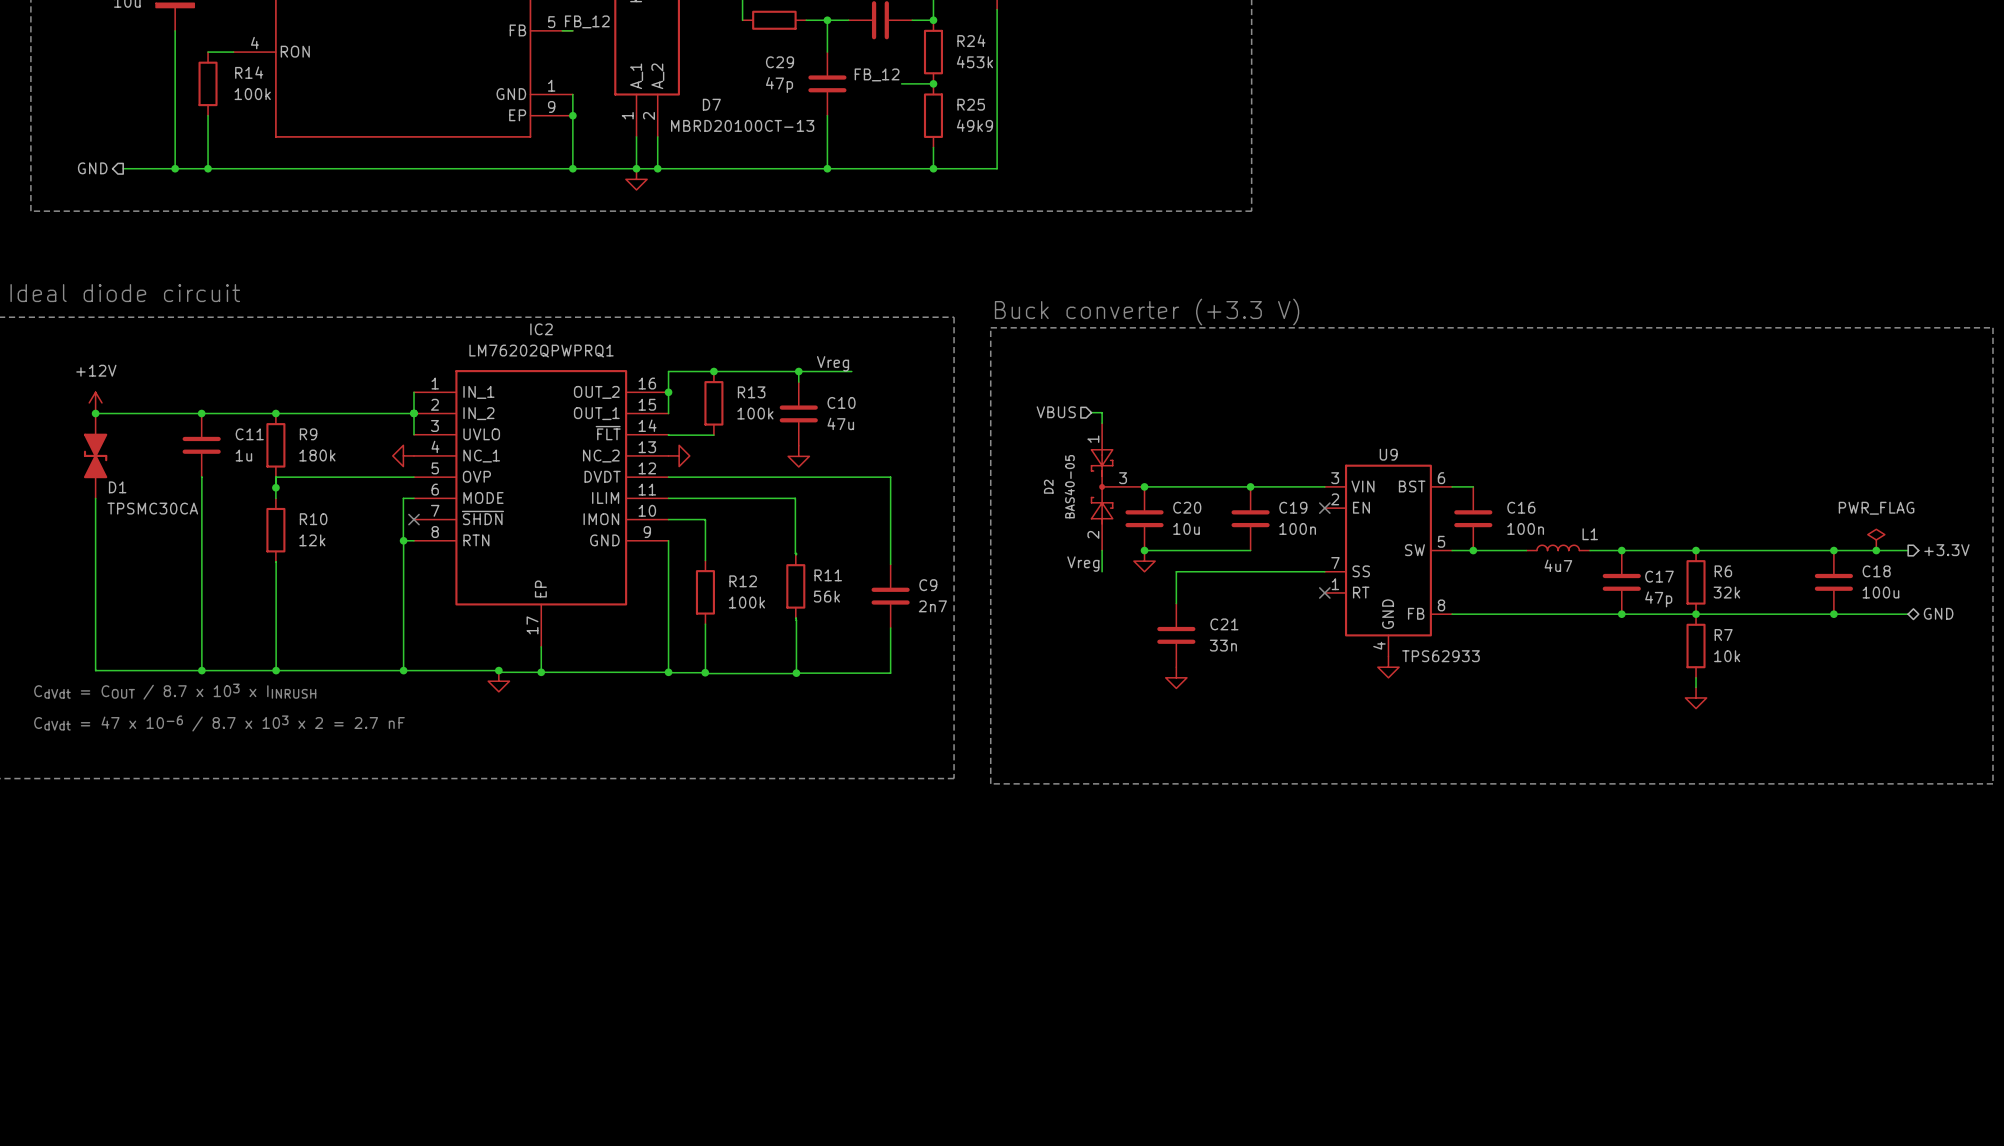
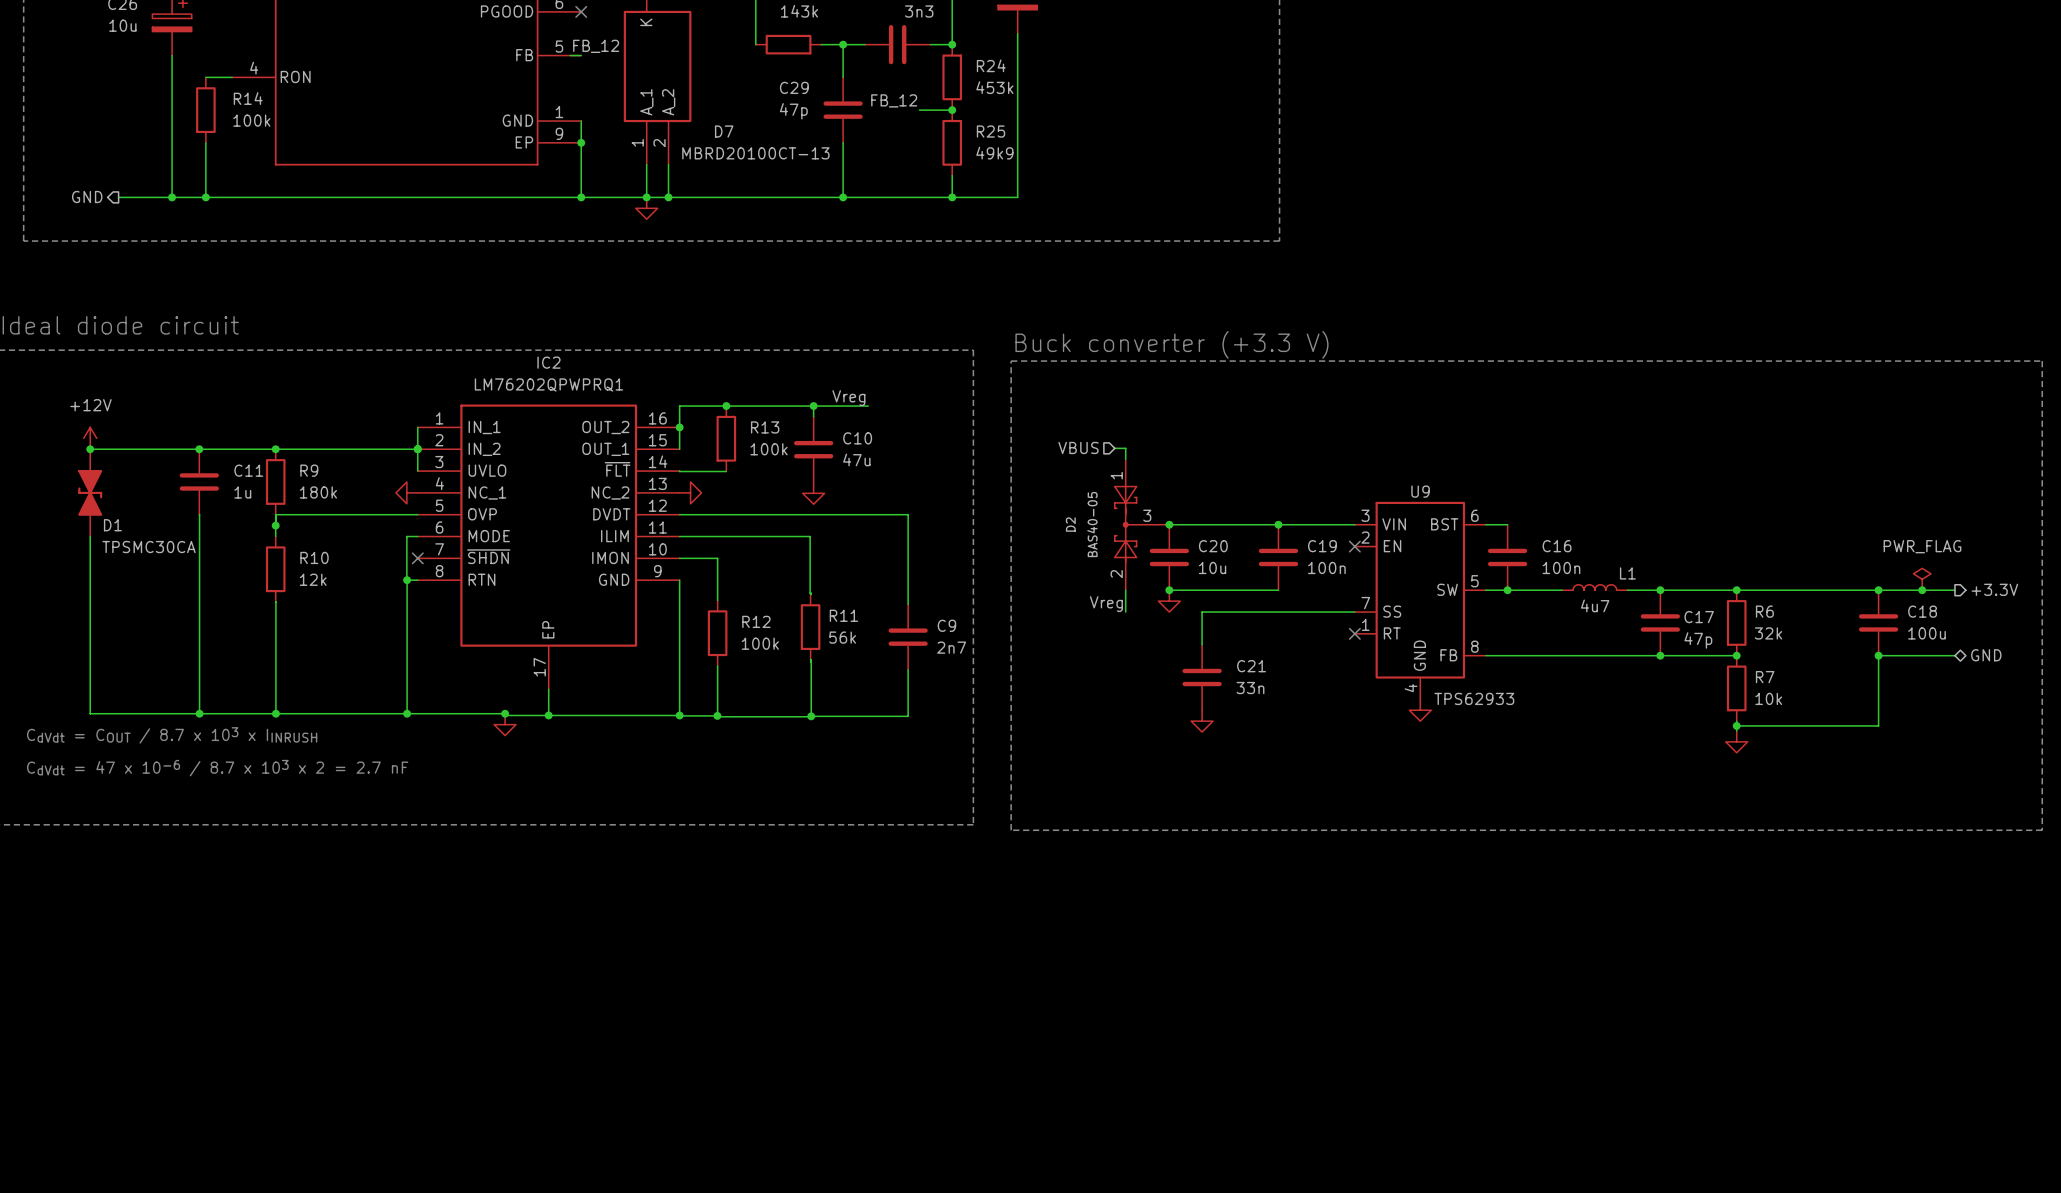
wire: (1696, 614) (1833, 614) -> (1736, 725) (1878, 725) (1878, 655)
junction: none -> (1736, 725)

